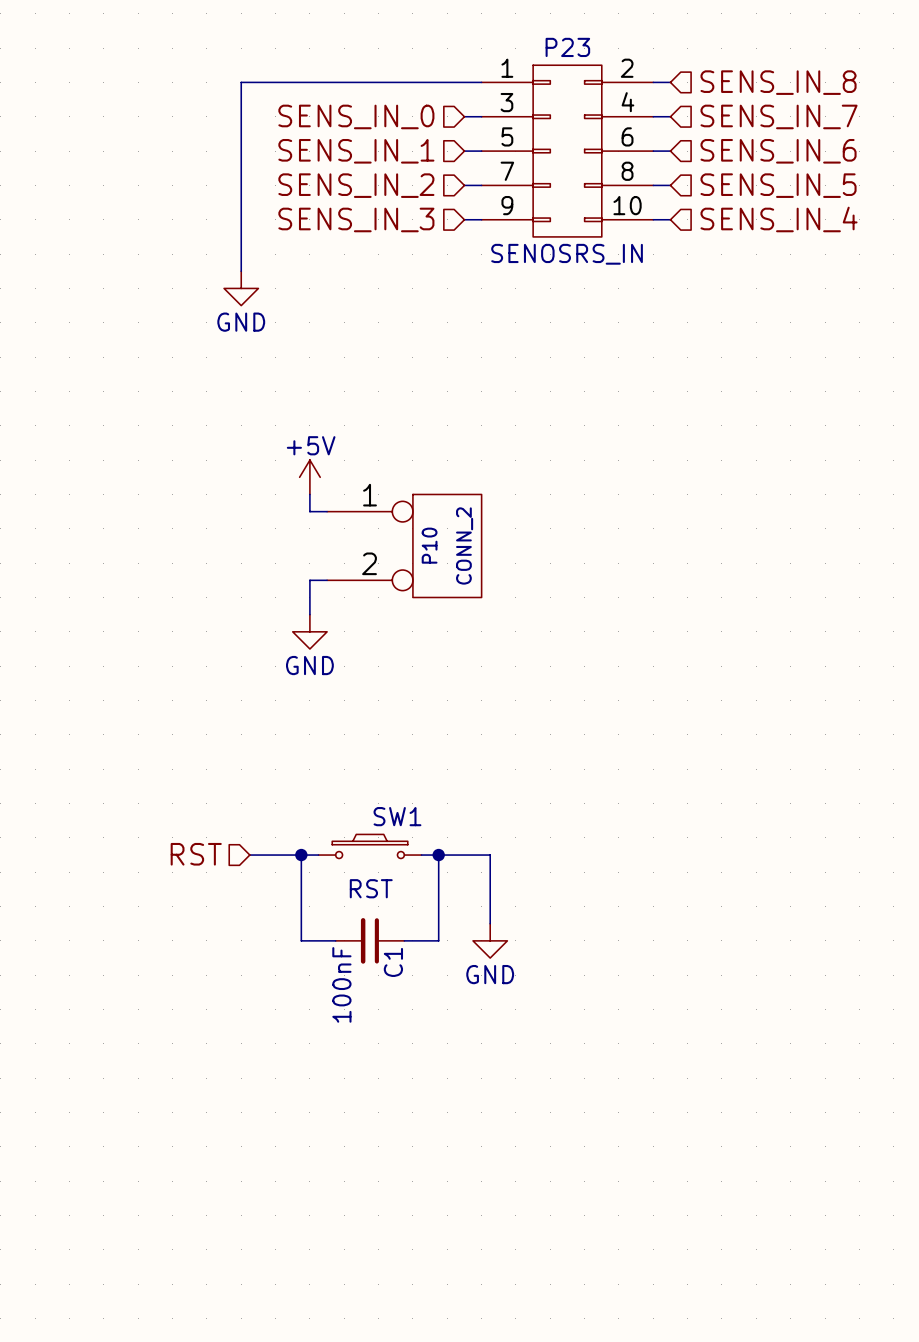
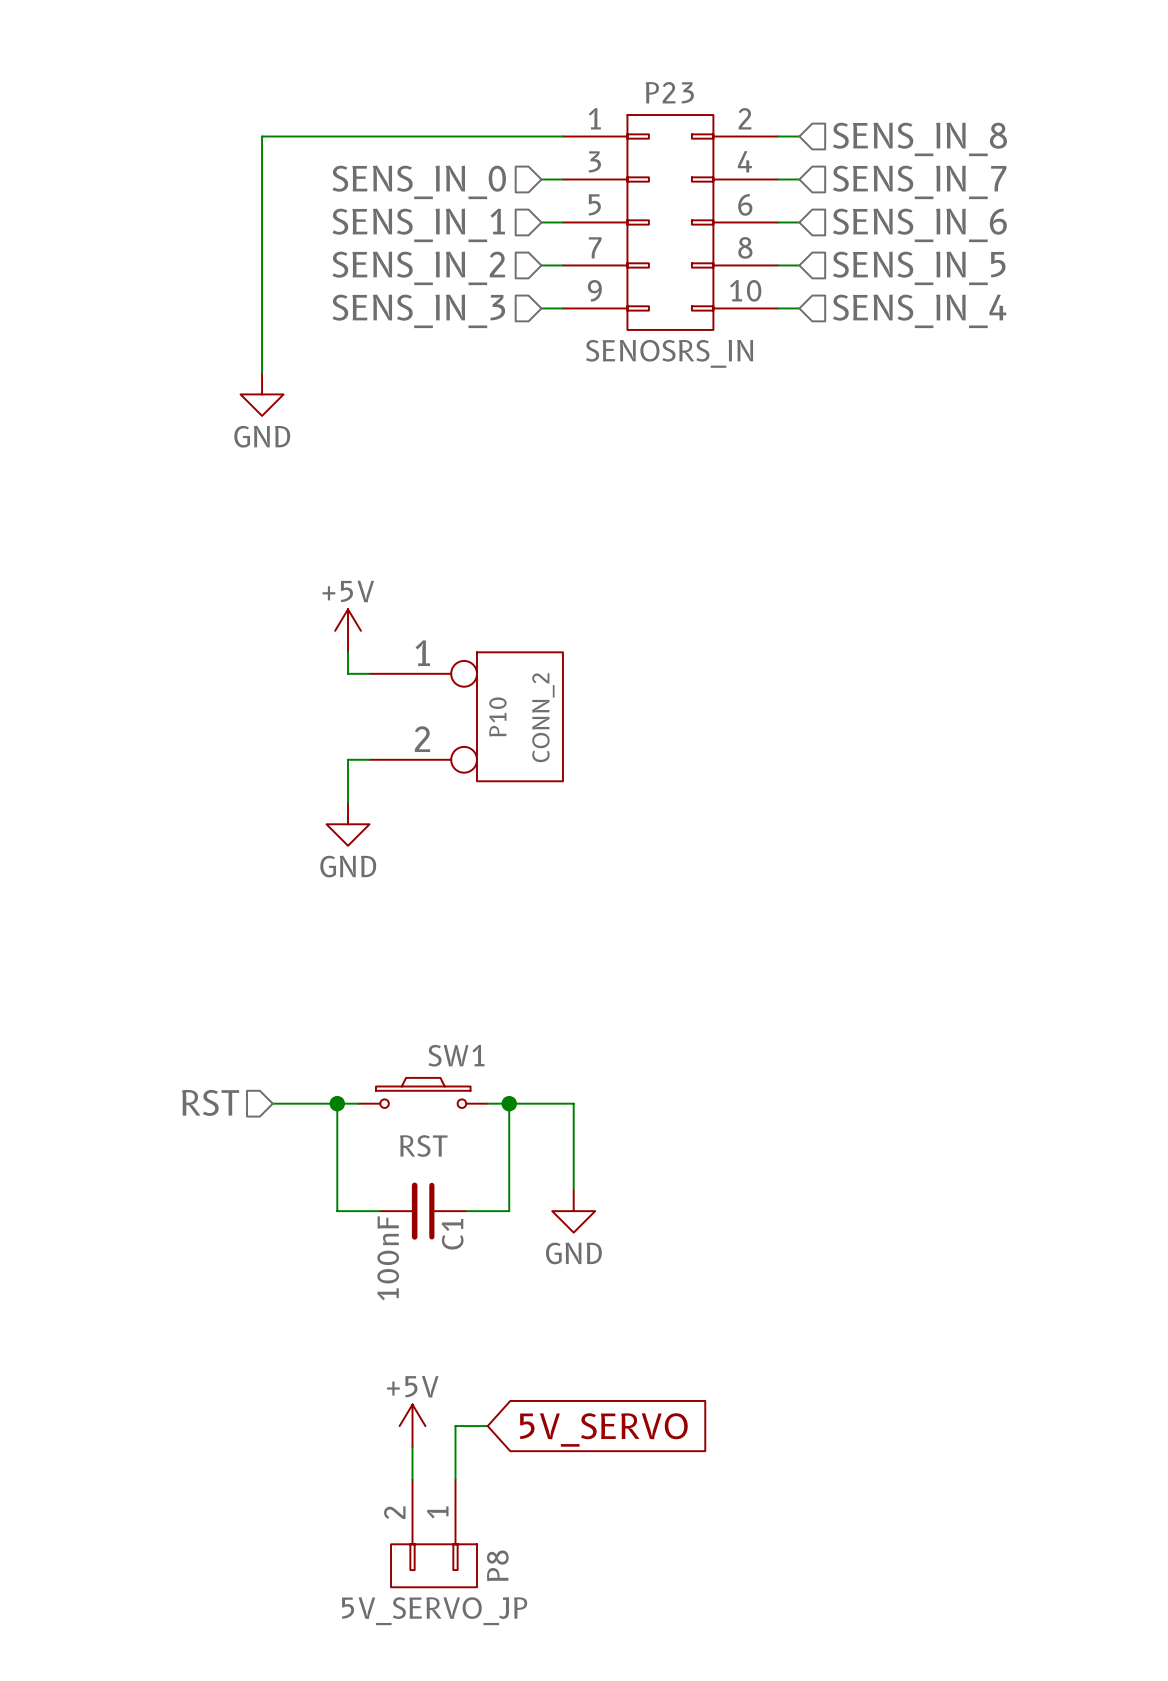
power symbol: none -> +5V (412, 1426)
wire: none -> (487, 1426) (455, 1426) (455, 1479)
global label: none -> 5V_SERVO (603, 1429)
wire: none -> (412, 1447) (412, 1479)
P8: none -> 5V_SERVO_JP (434, 1533)

